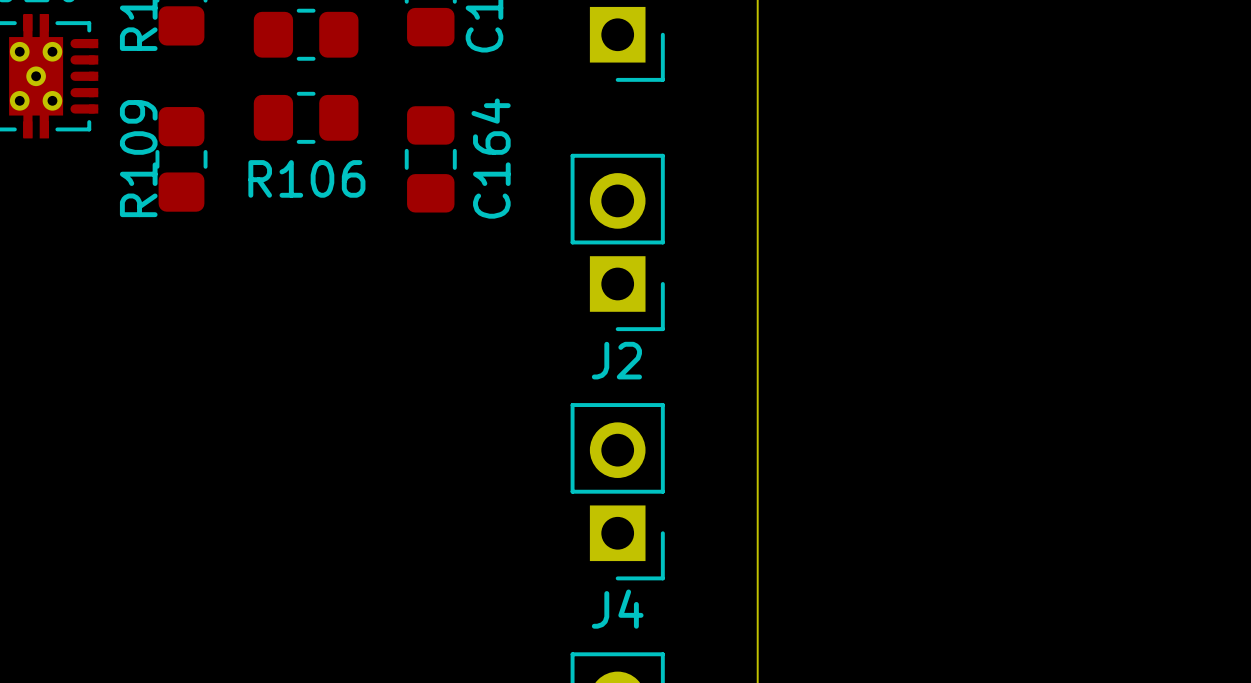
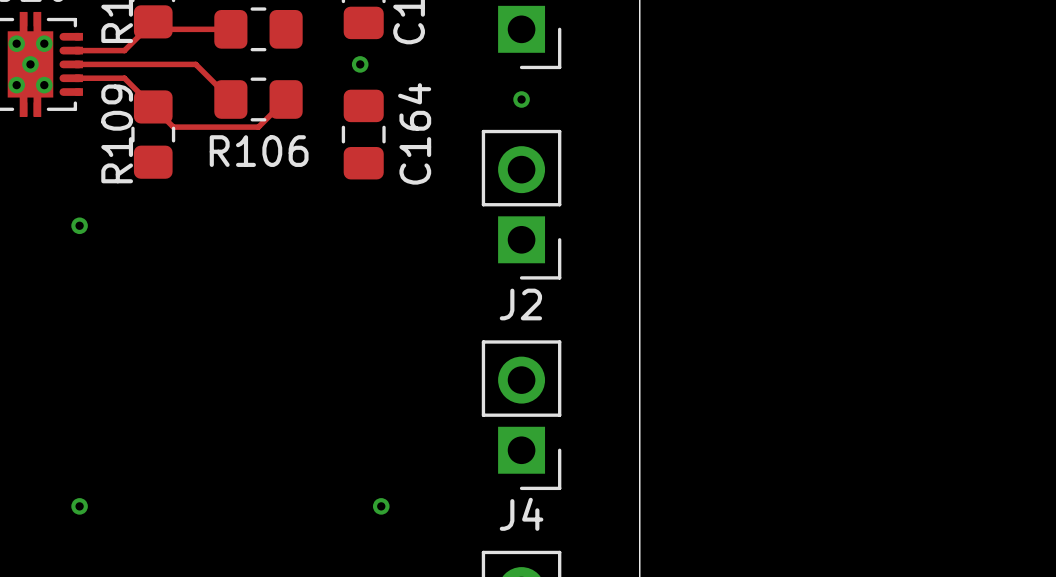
track: none -> (230, 29) (160, 29) (153, 21) (124, 50) (71, 50)
track: none -> (71, 64) (195, 64) (230, 99)
via: none -> (360, 64)
track: none -> (71, 78) (124, 78) (173, 127) (258, 127) (286, 99)
via: none -> (521, 99)
via: none -> (79, 225)
via: none -> (79, 506)
via: none -> (381, 506)

